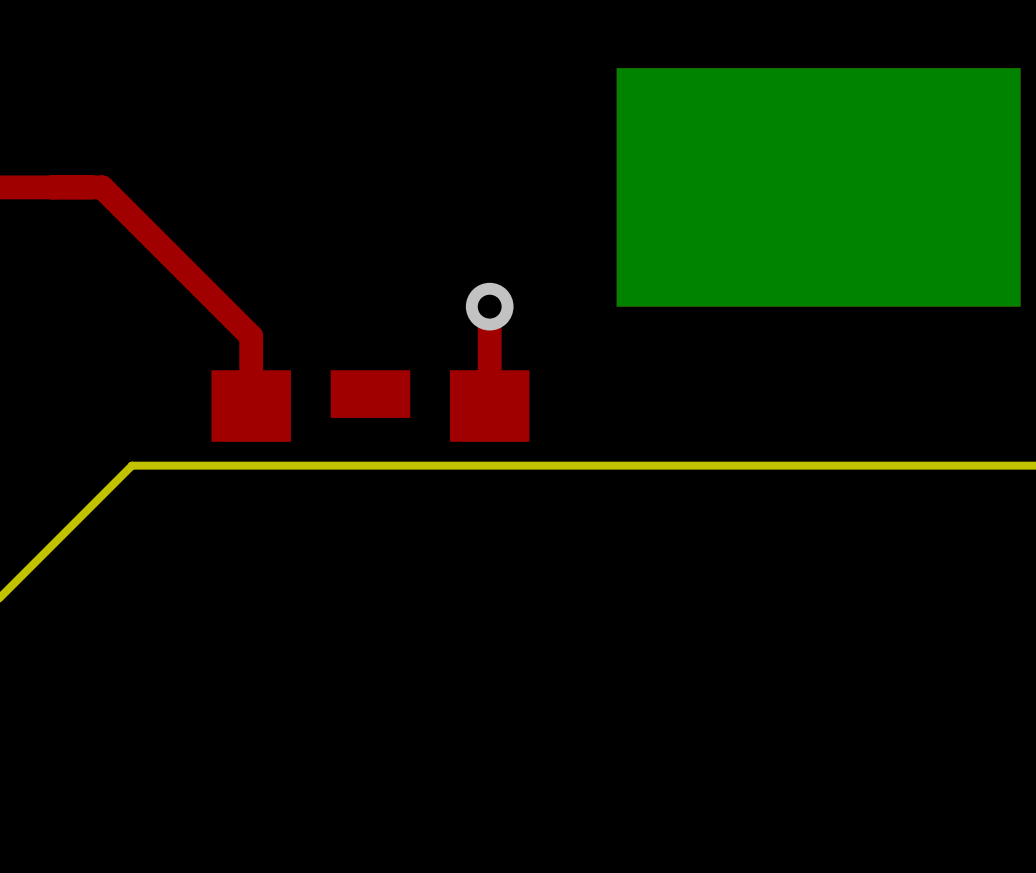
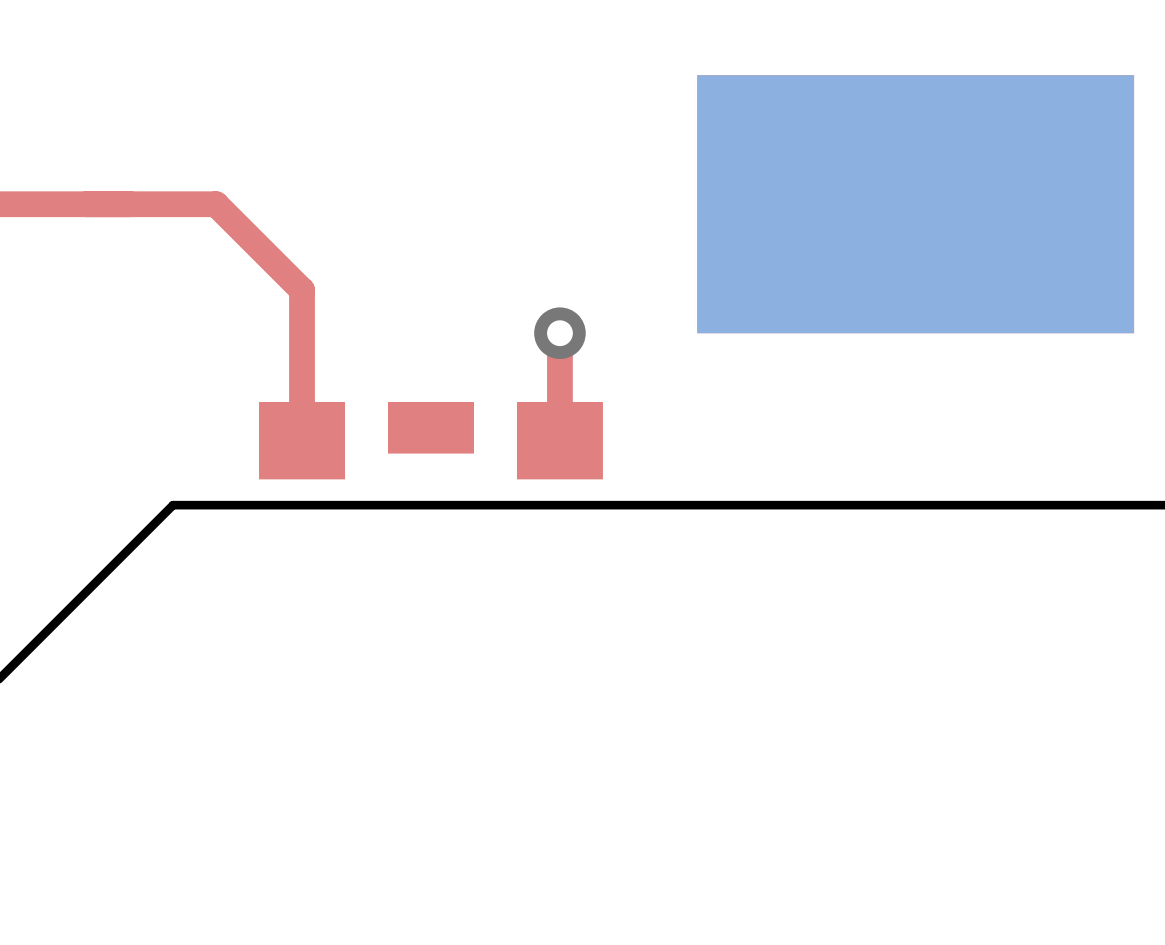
top track: (102, 187) (251, 336) -> (140, 204) (216, 204) (302, 290) (302, 365)

